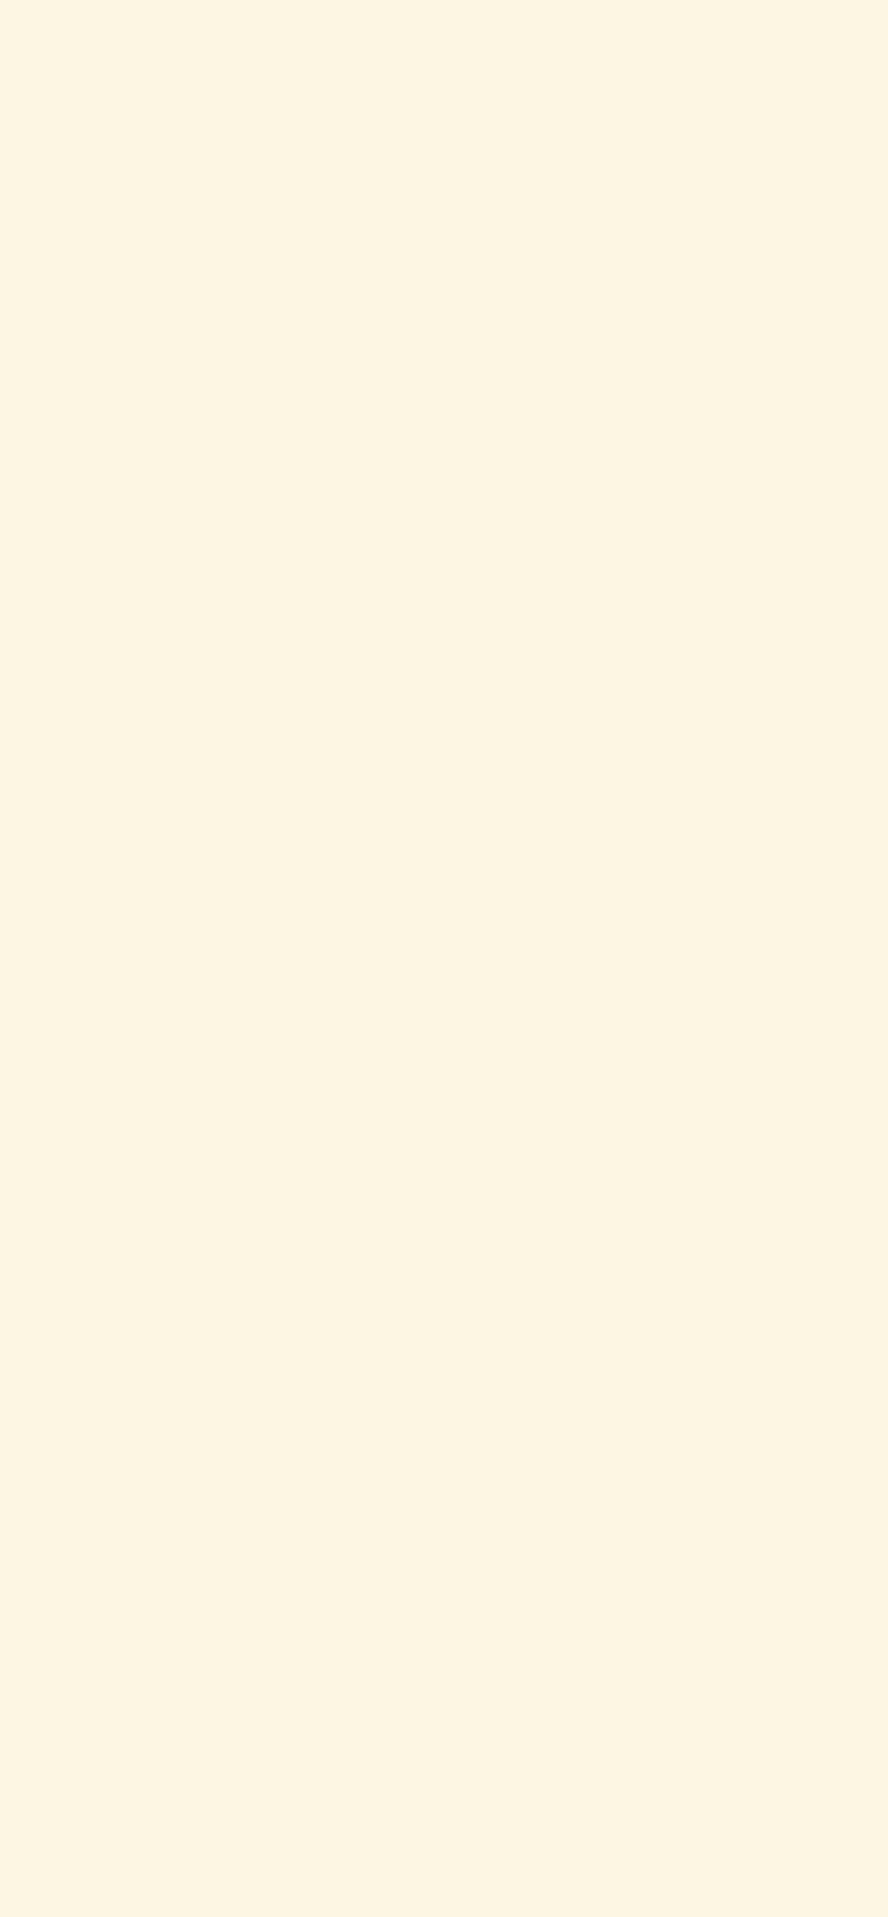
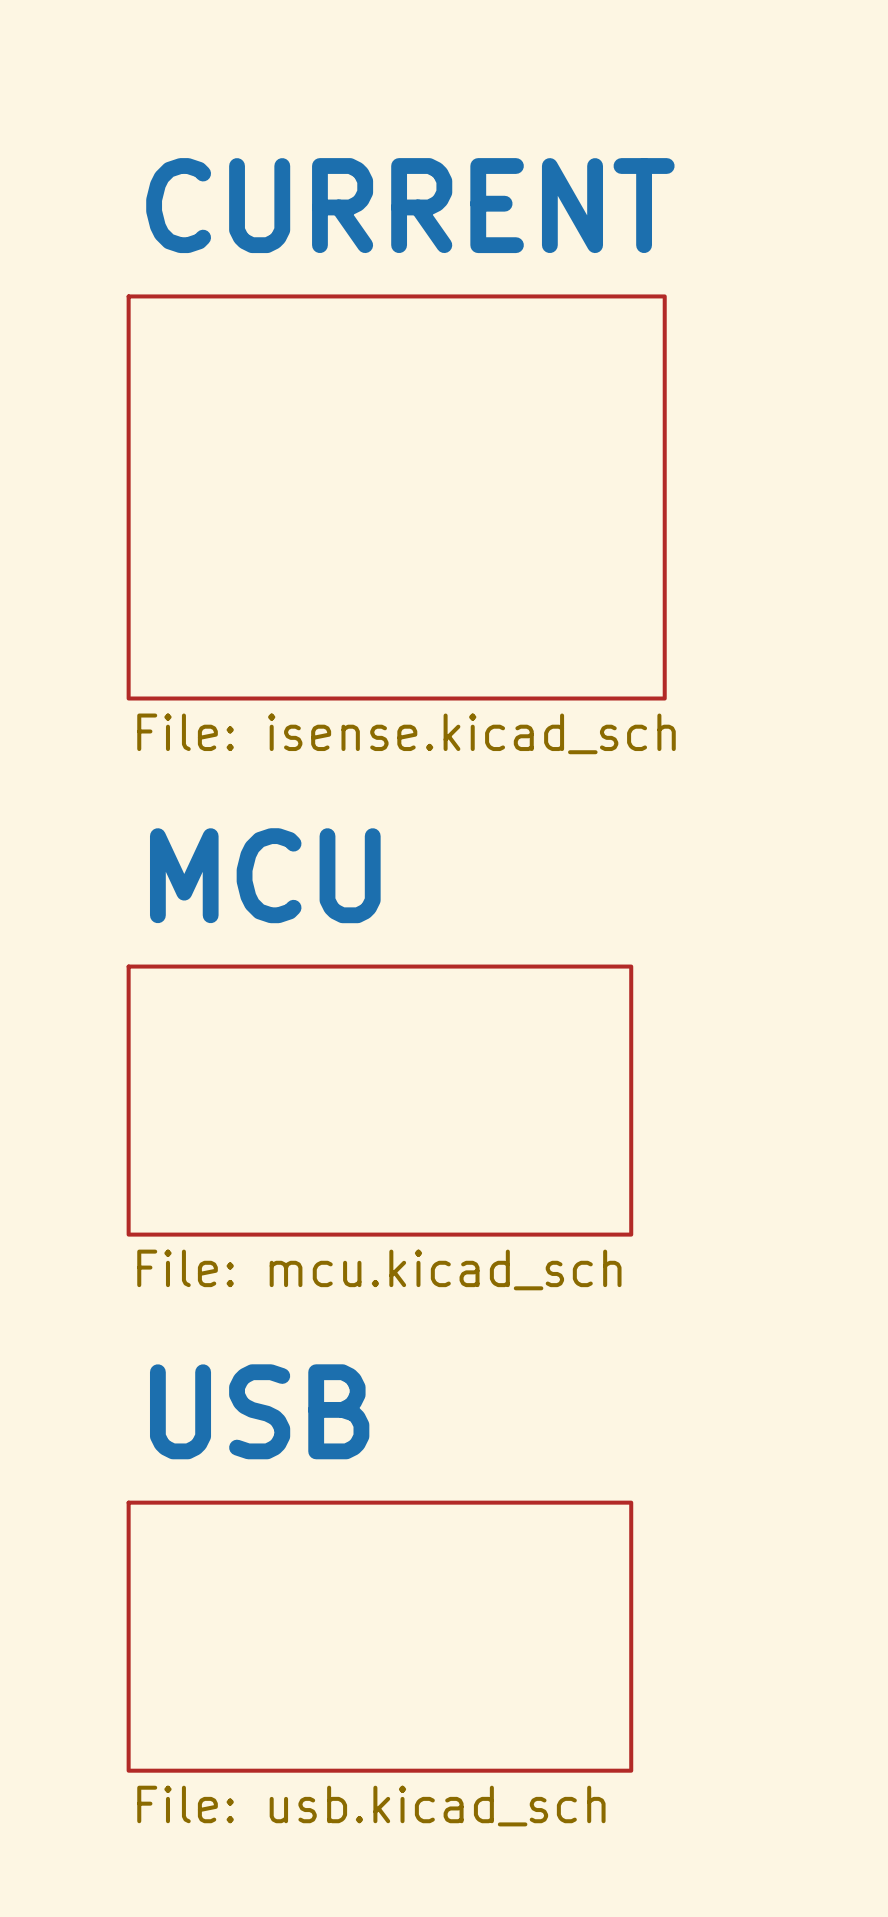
sheet CURRENT: none -> File: isense.kicad_sch (396, 497)
sheet MCU: none -> File: mcu.kicad_sch (379, 1100)
sheet USB: none -> File: usb.kicad_sch (379, 1636)

